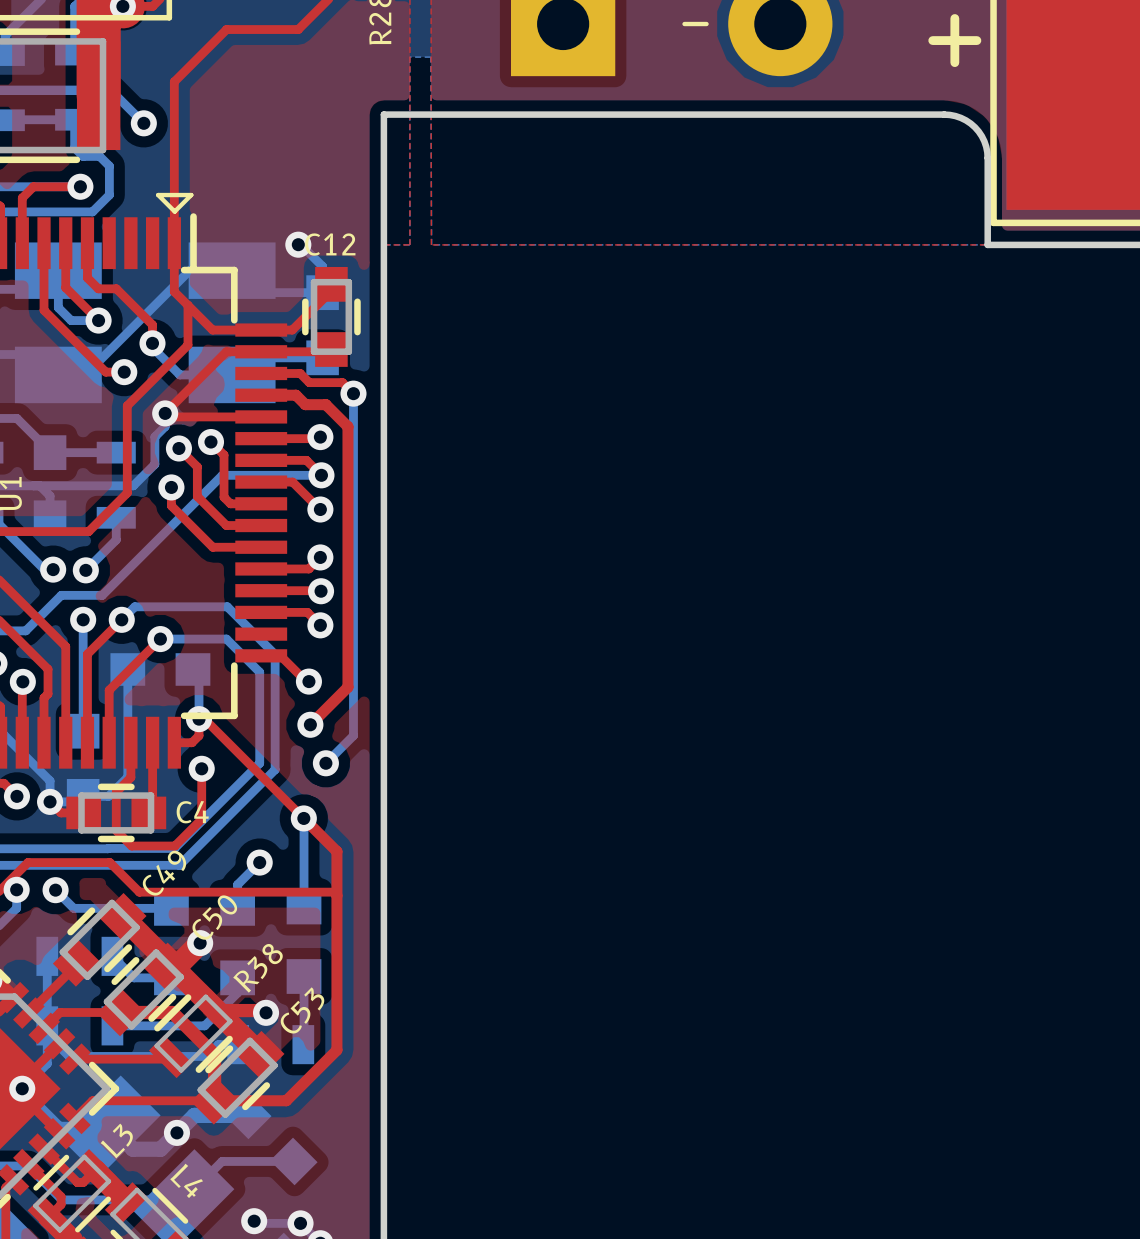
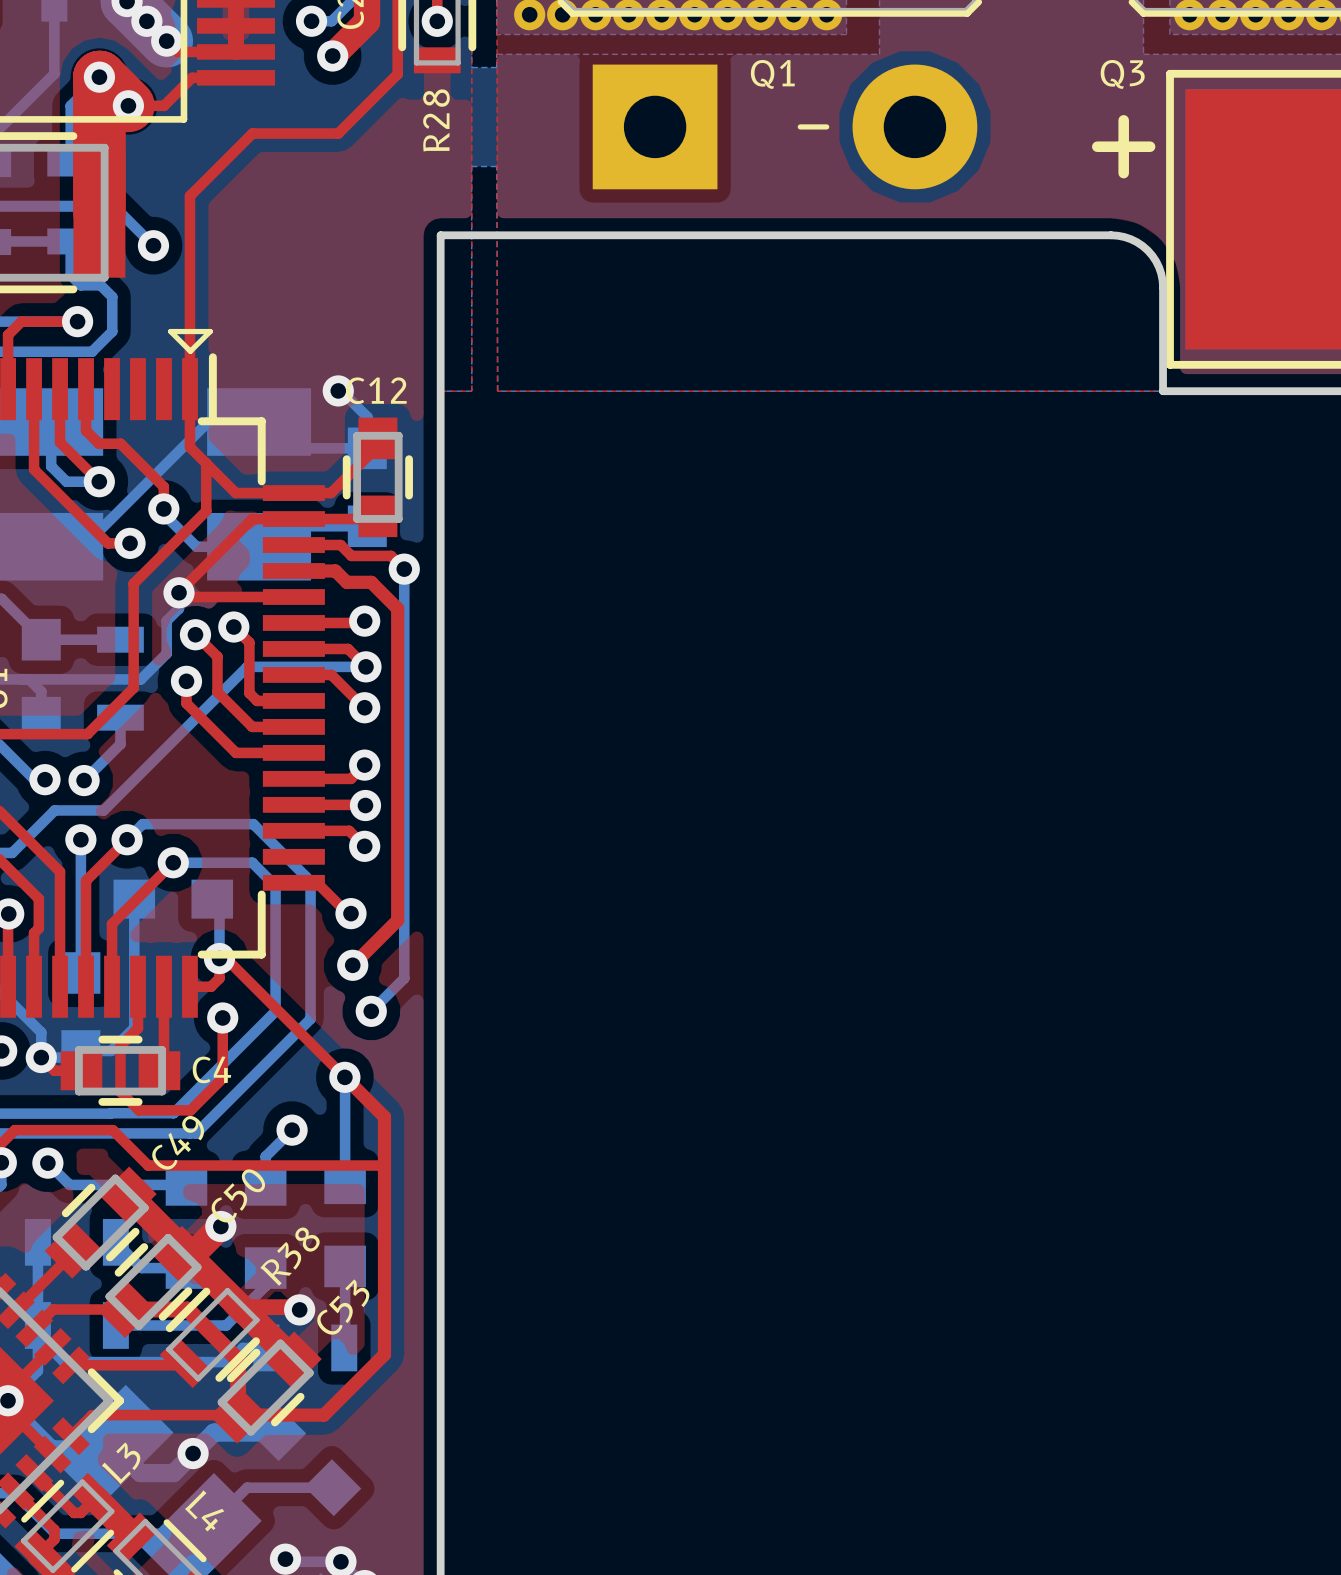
bottom track: (245, 658) (259, 672) (259, 763) (174, 848) (160, 848) -> (275, 885) (275, 1011) (173, 1113)

